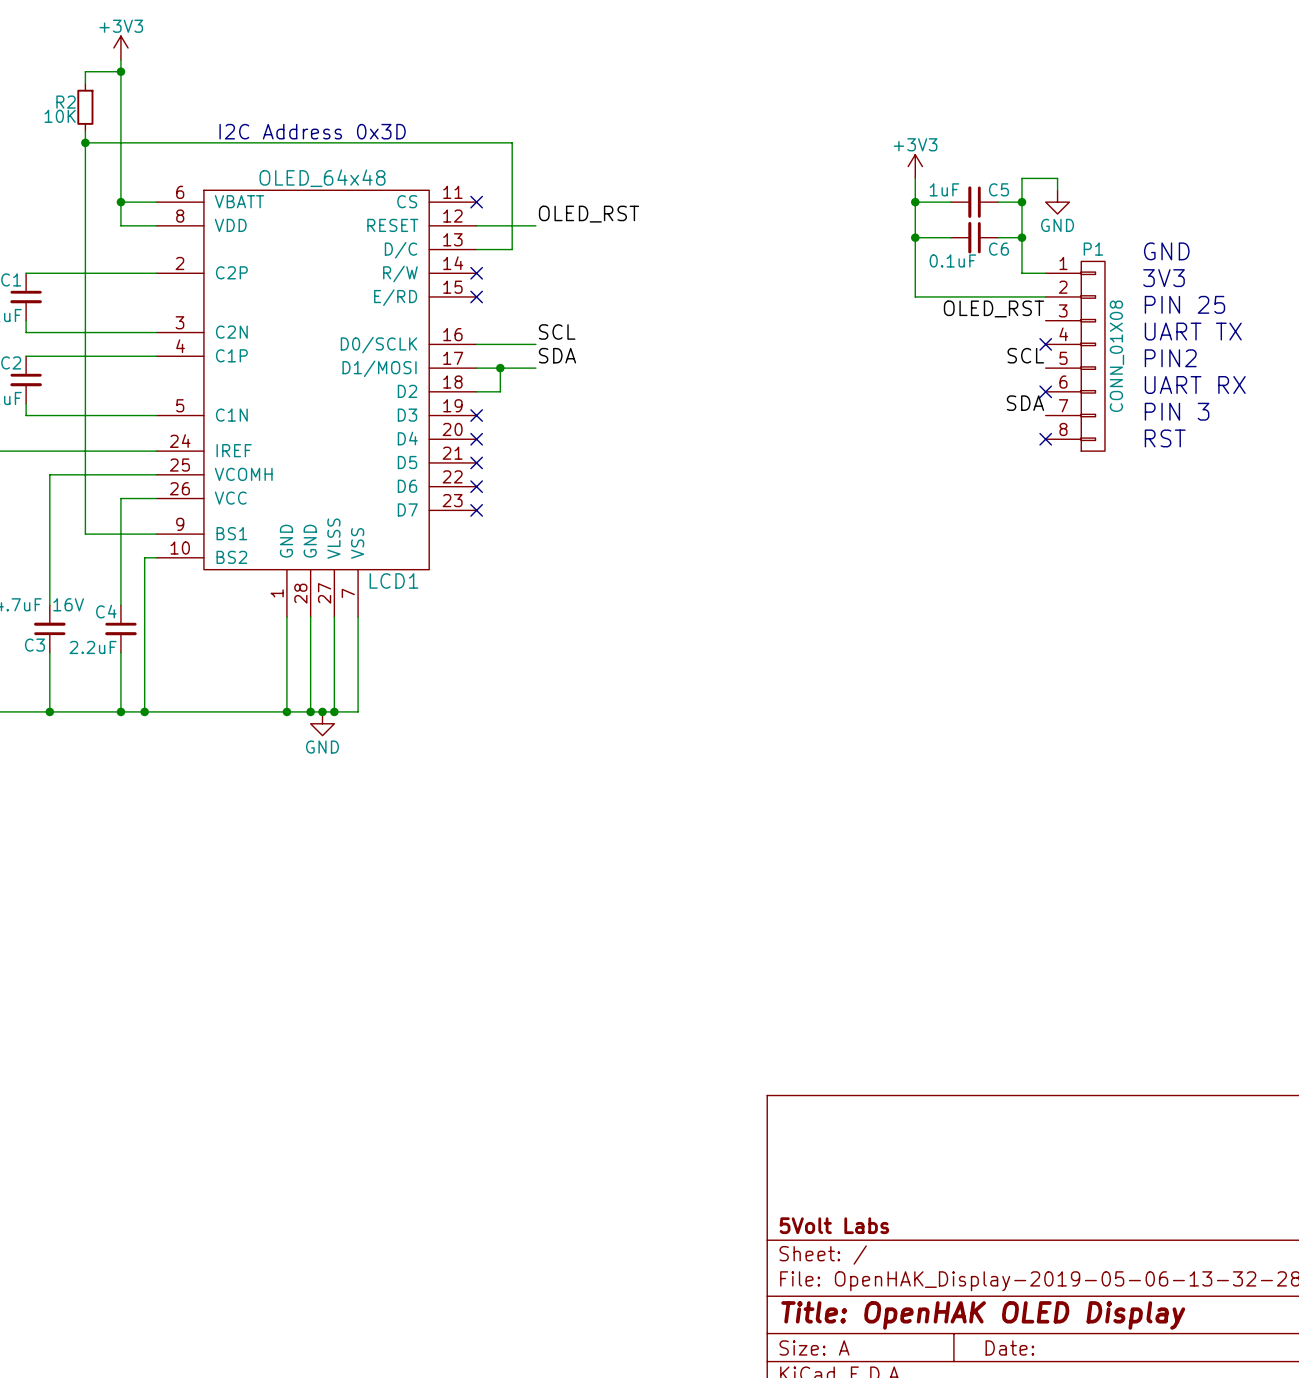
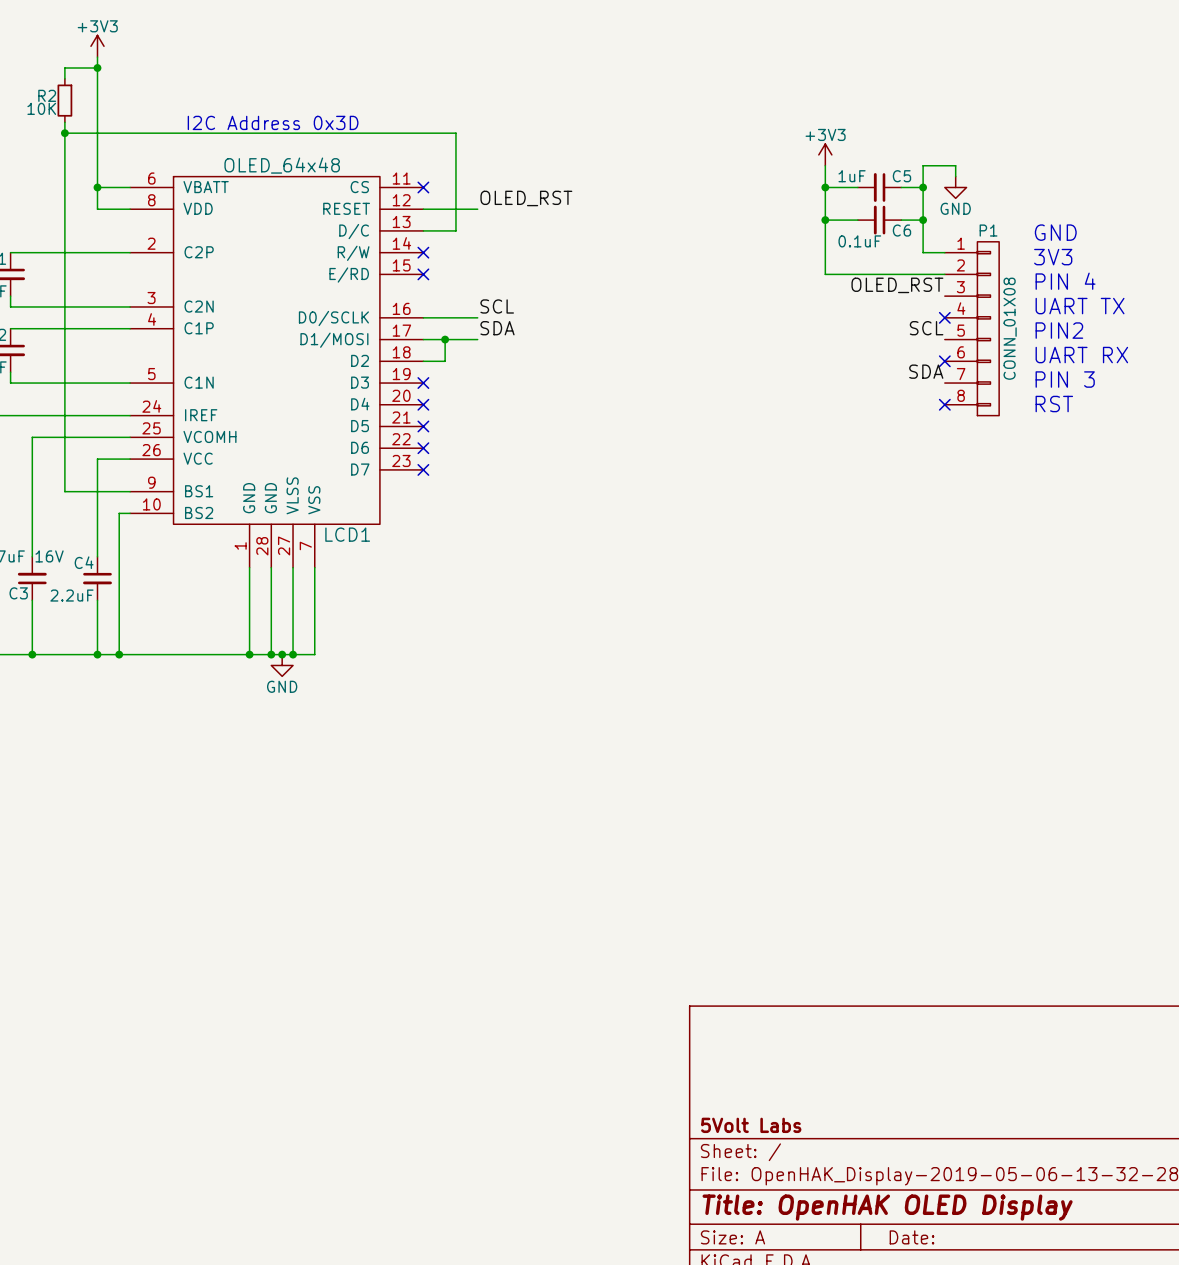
text: PIN 25 (1184, 304) -> PIN 4 (1065, 281)

